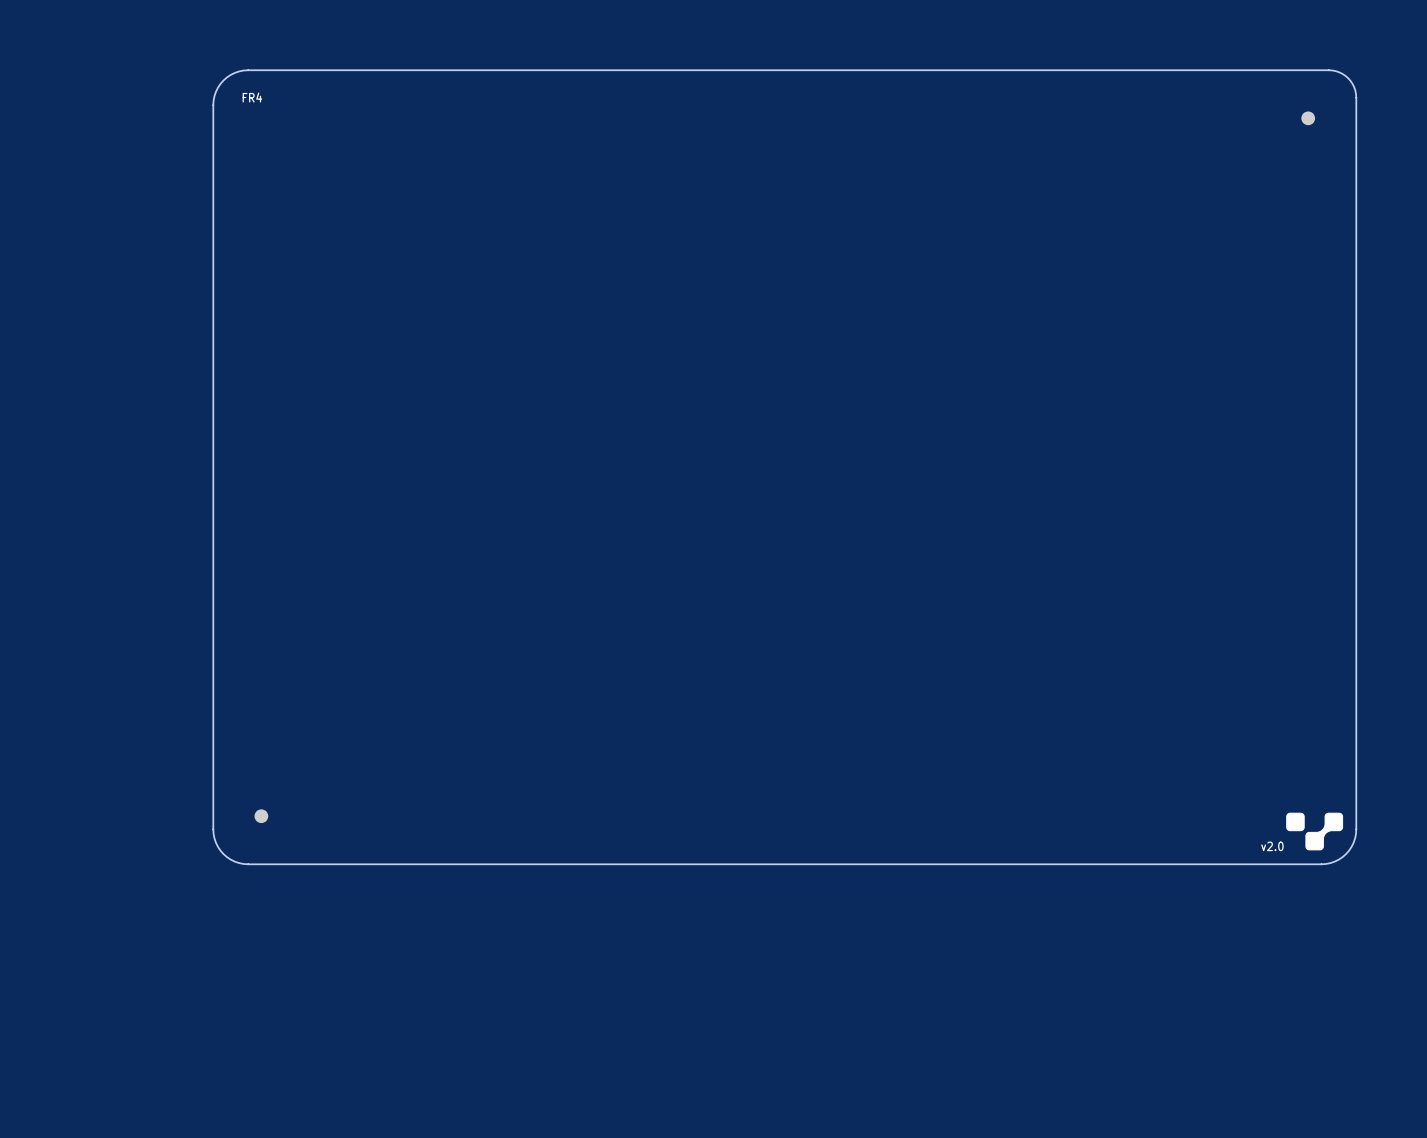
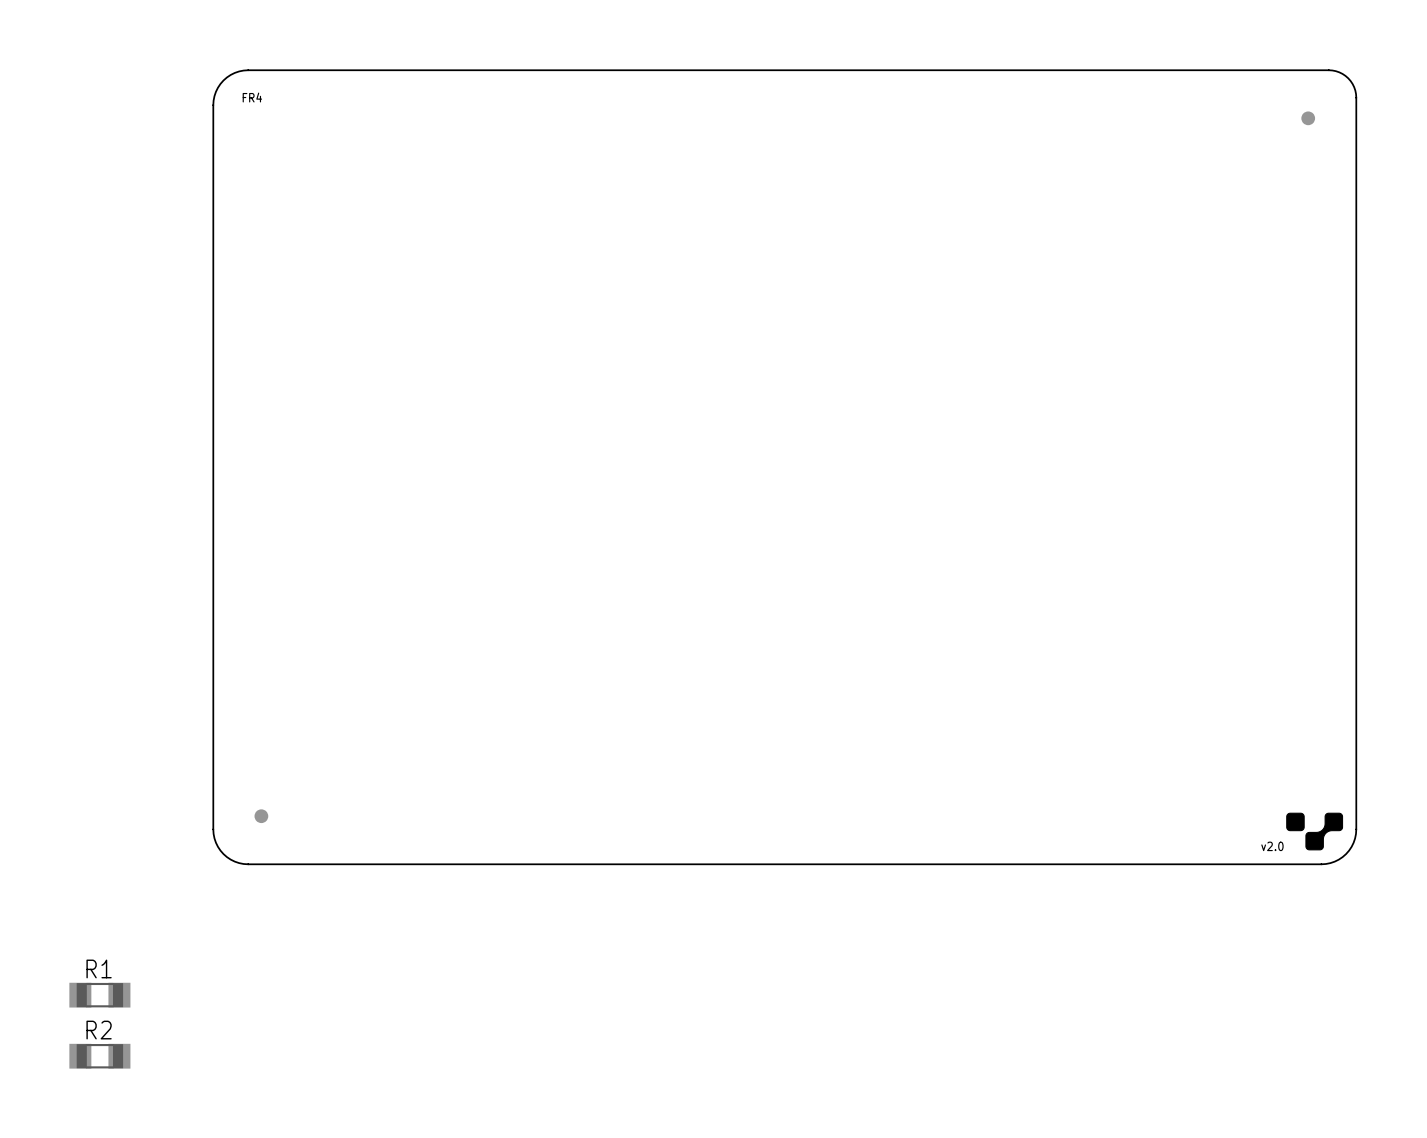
R1: none -> (99, 995)
R2: none -> (99, 1056)

